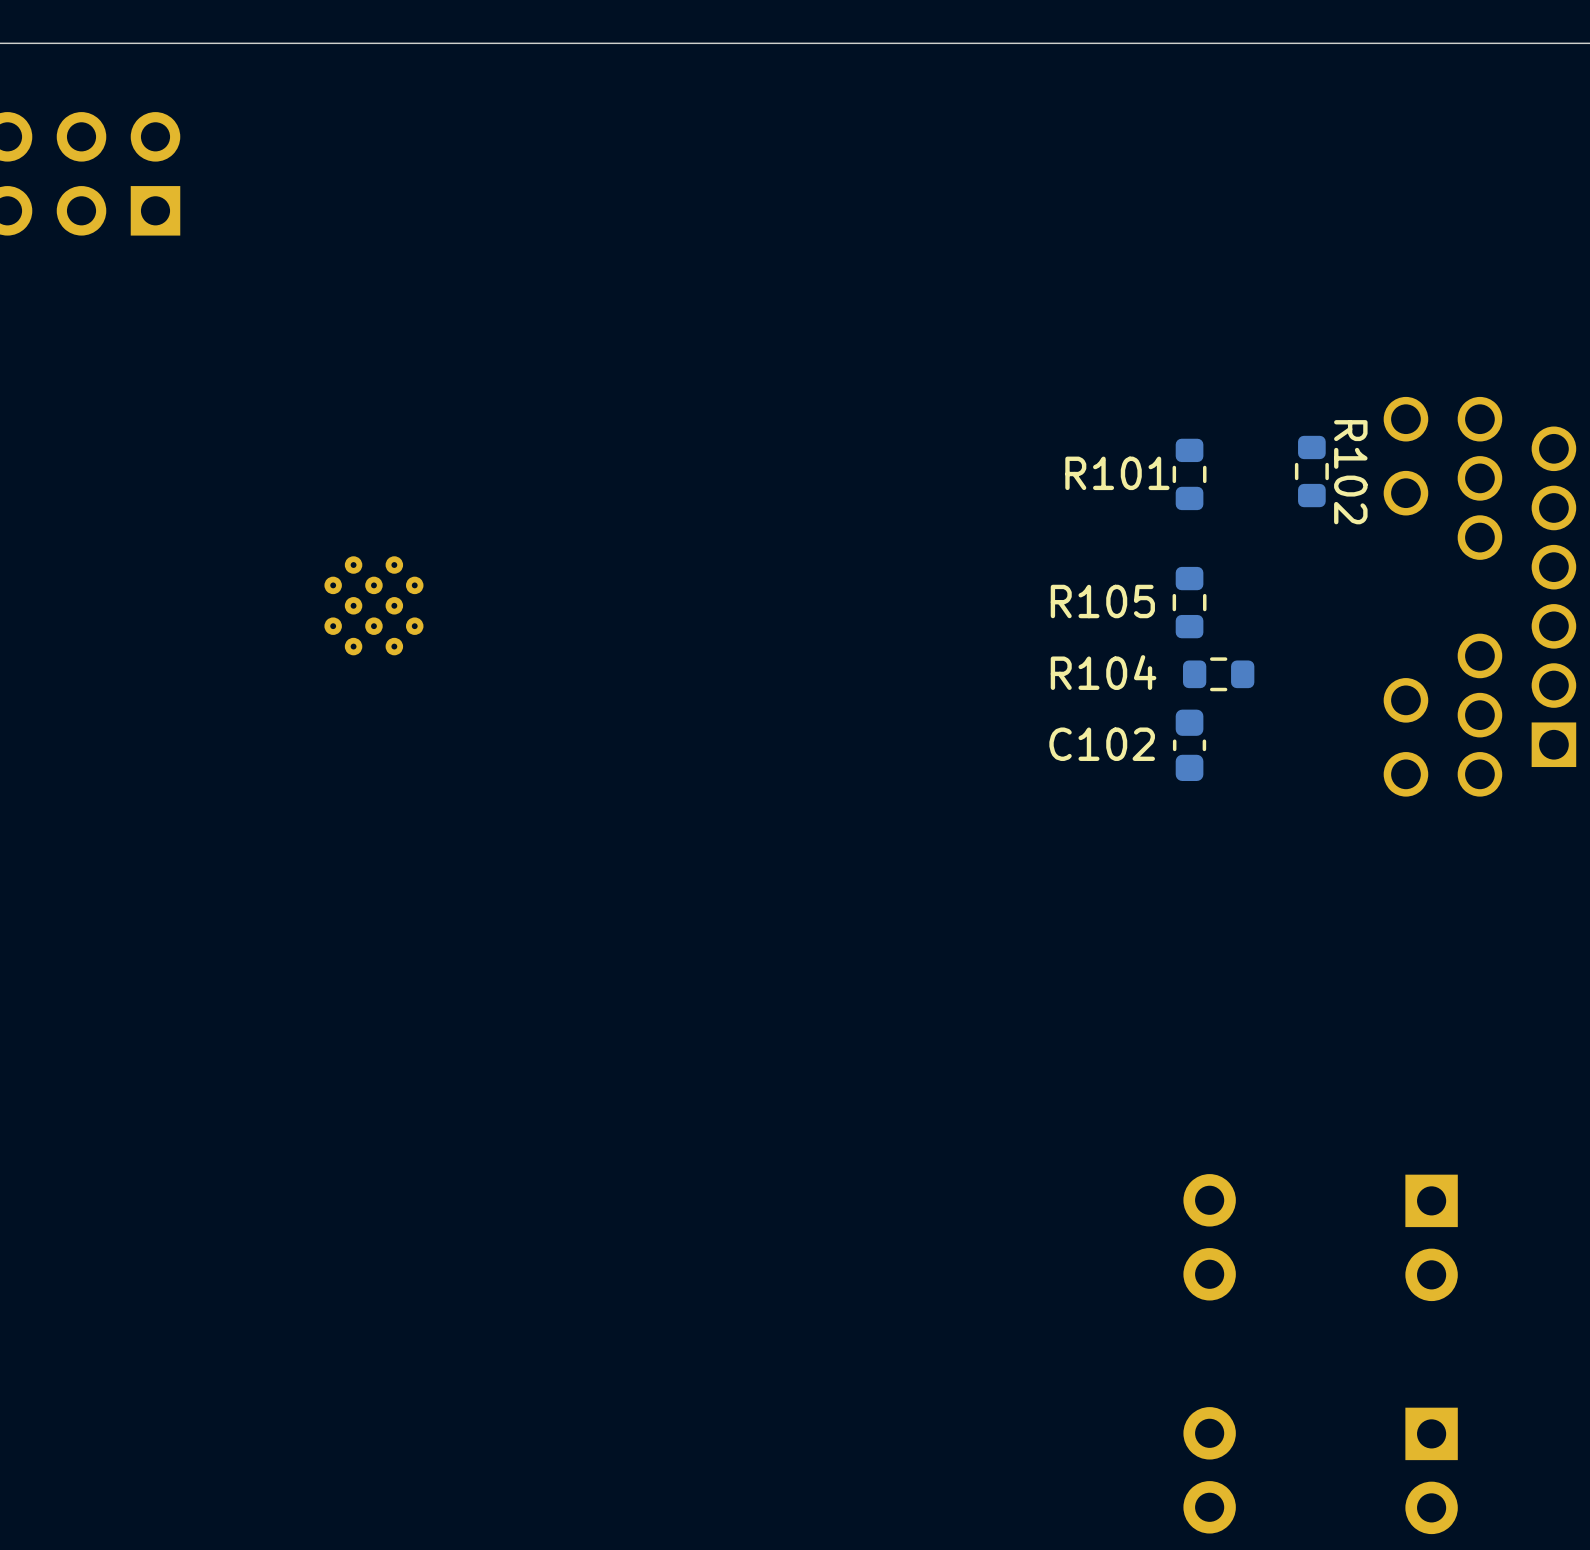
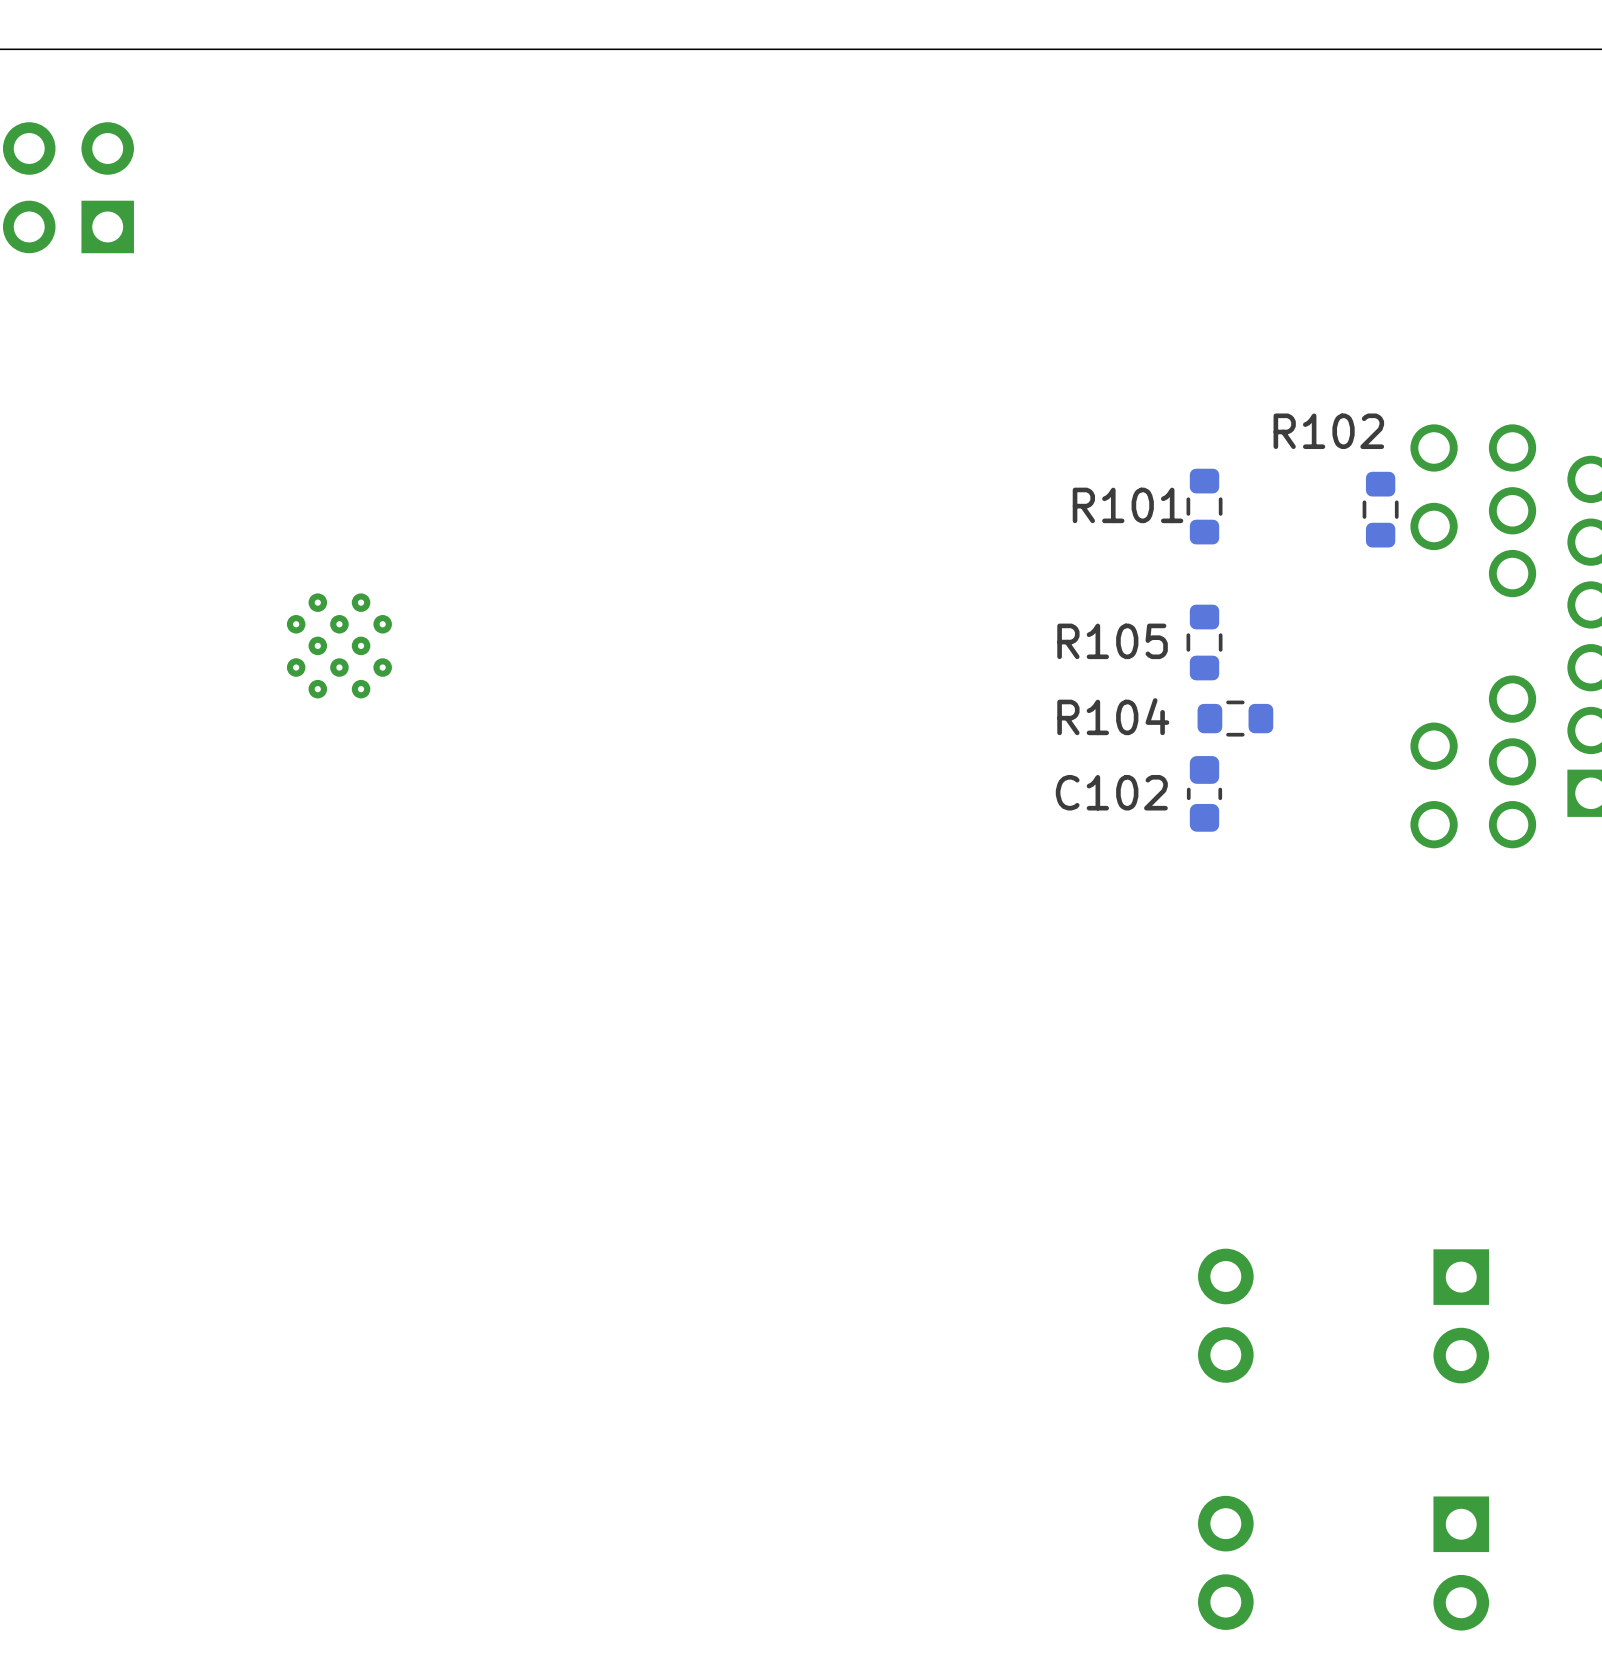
R102 position: (1311, 471) -> (1380, 509)
R102 name rotation: 0° (1350, 472) -> 90° counterclockwise (1328, 431)

